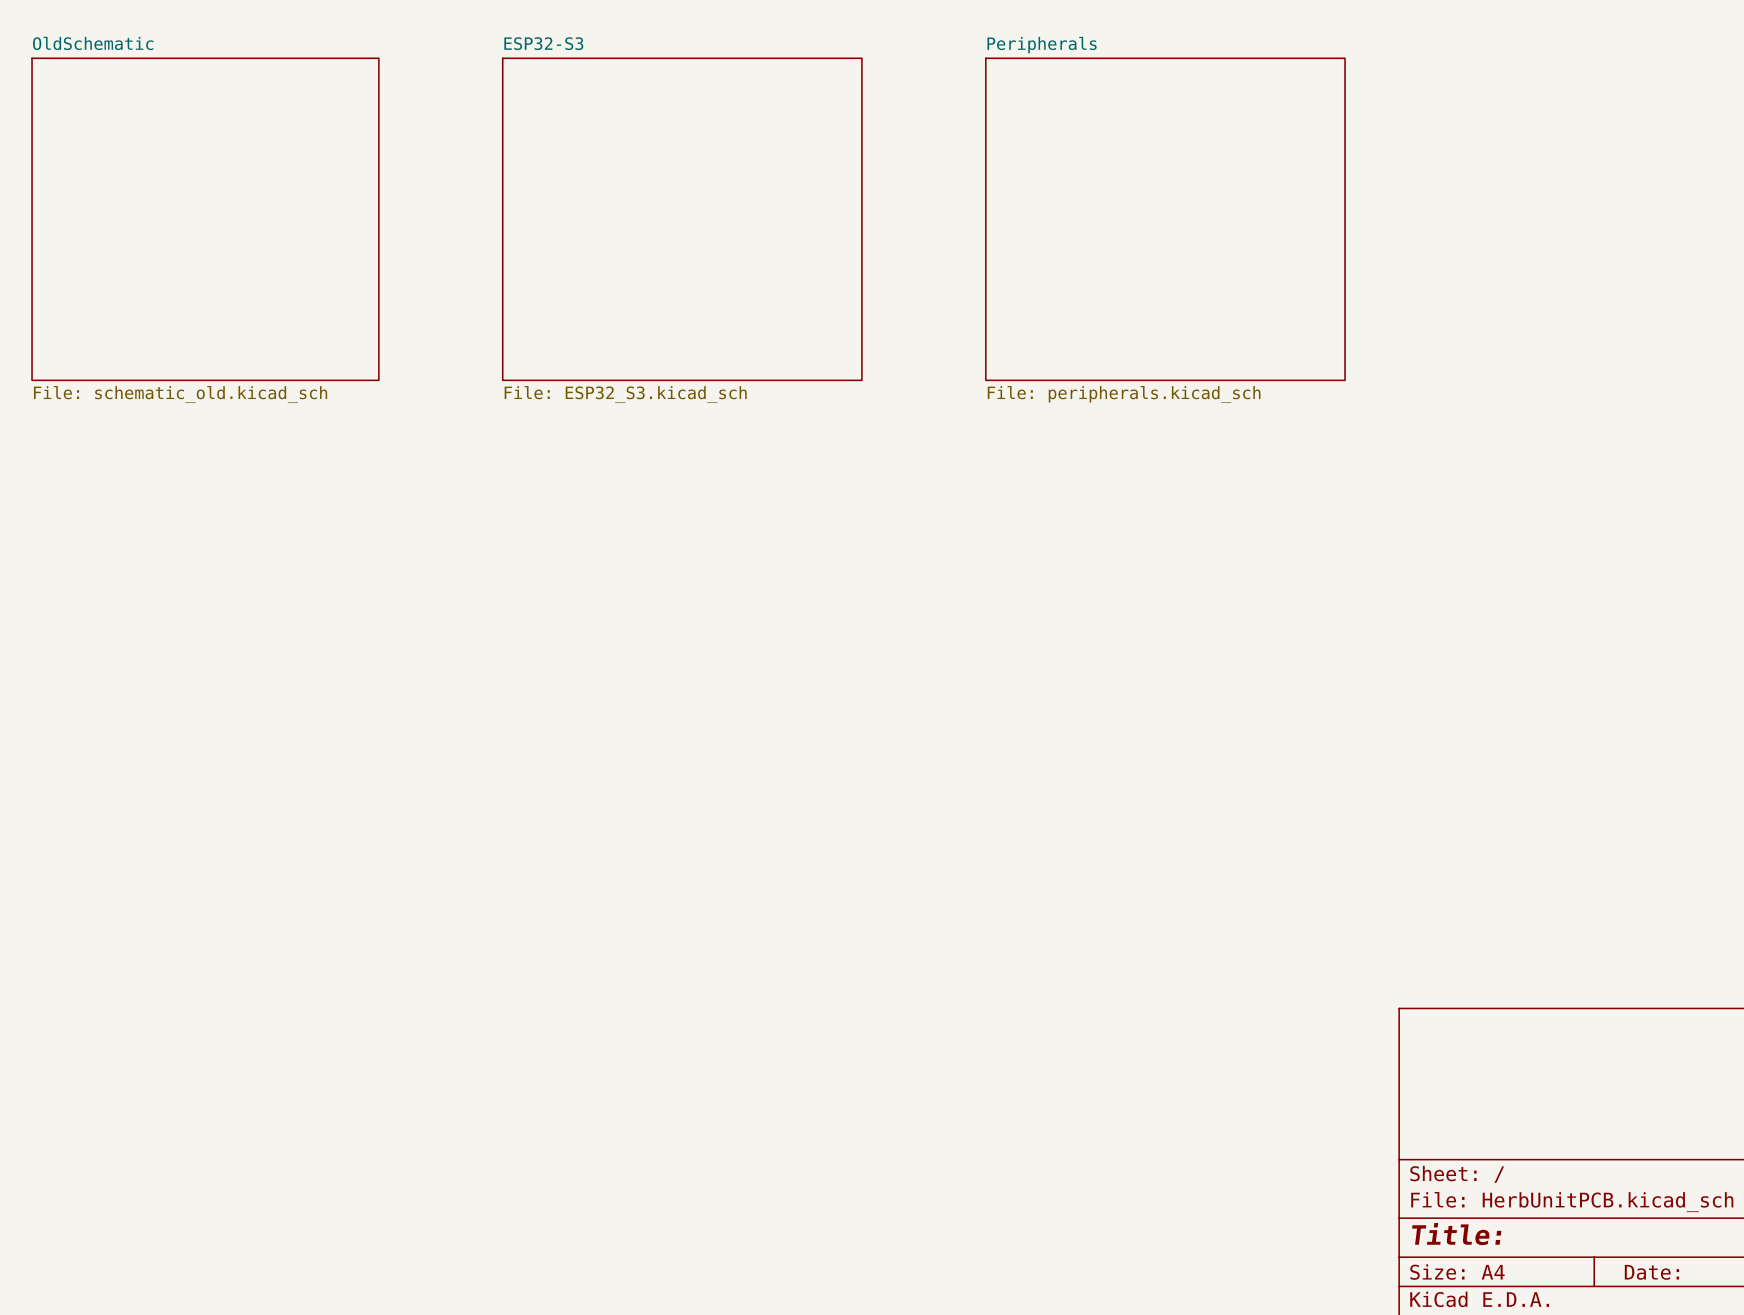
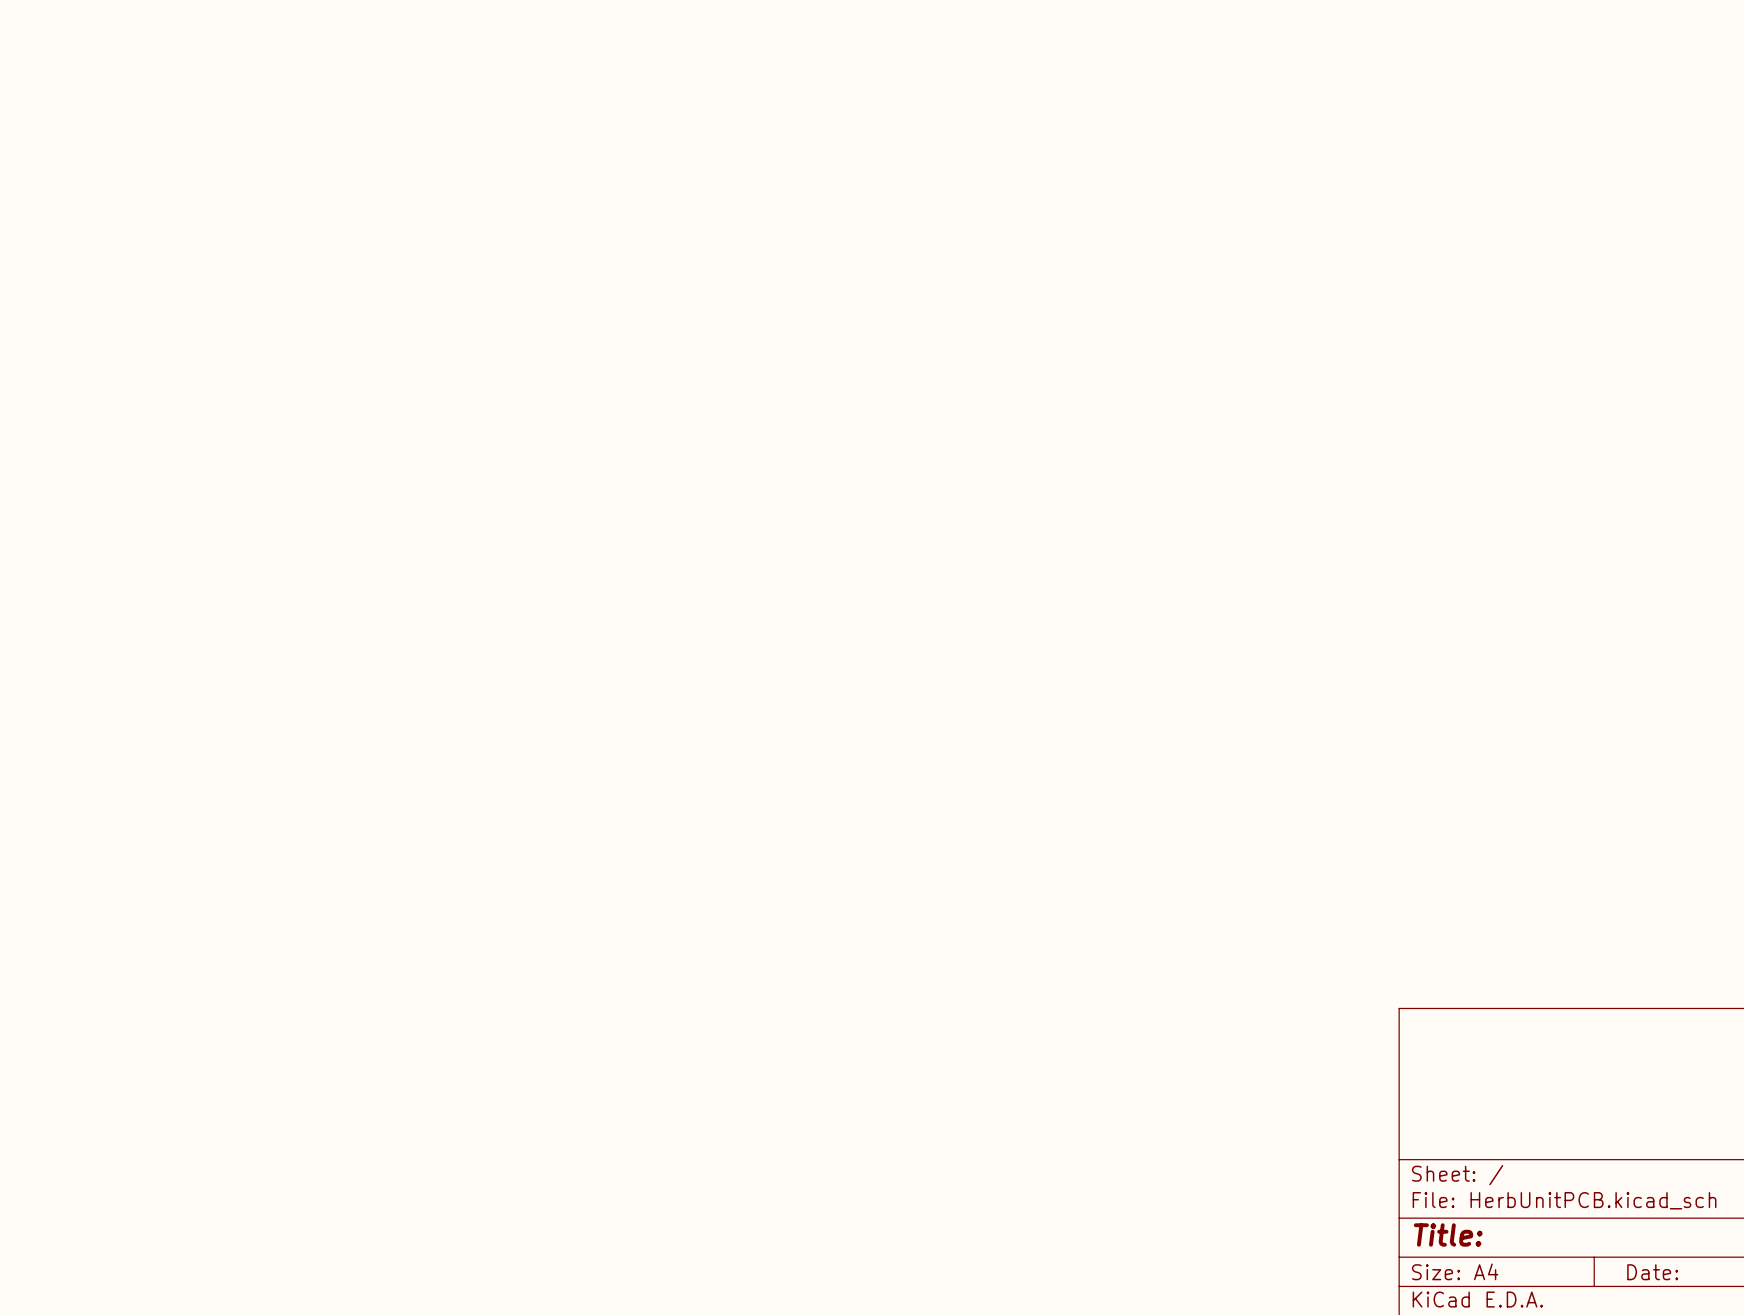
sheet OldSchematic: File: schematic_old.kicad_sch (205, 219) -> none
sheet ESP32-S3: File: ESP32_S3.kicad_sch (682, 219) -> none
sheet Peripherals: File: peripherals.kicad_sch (1165, 219) -> none

